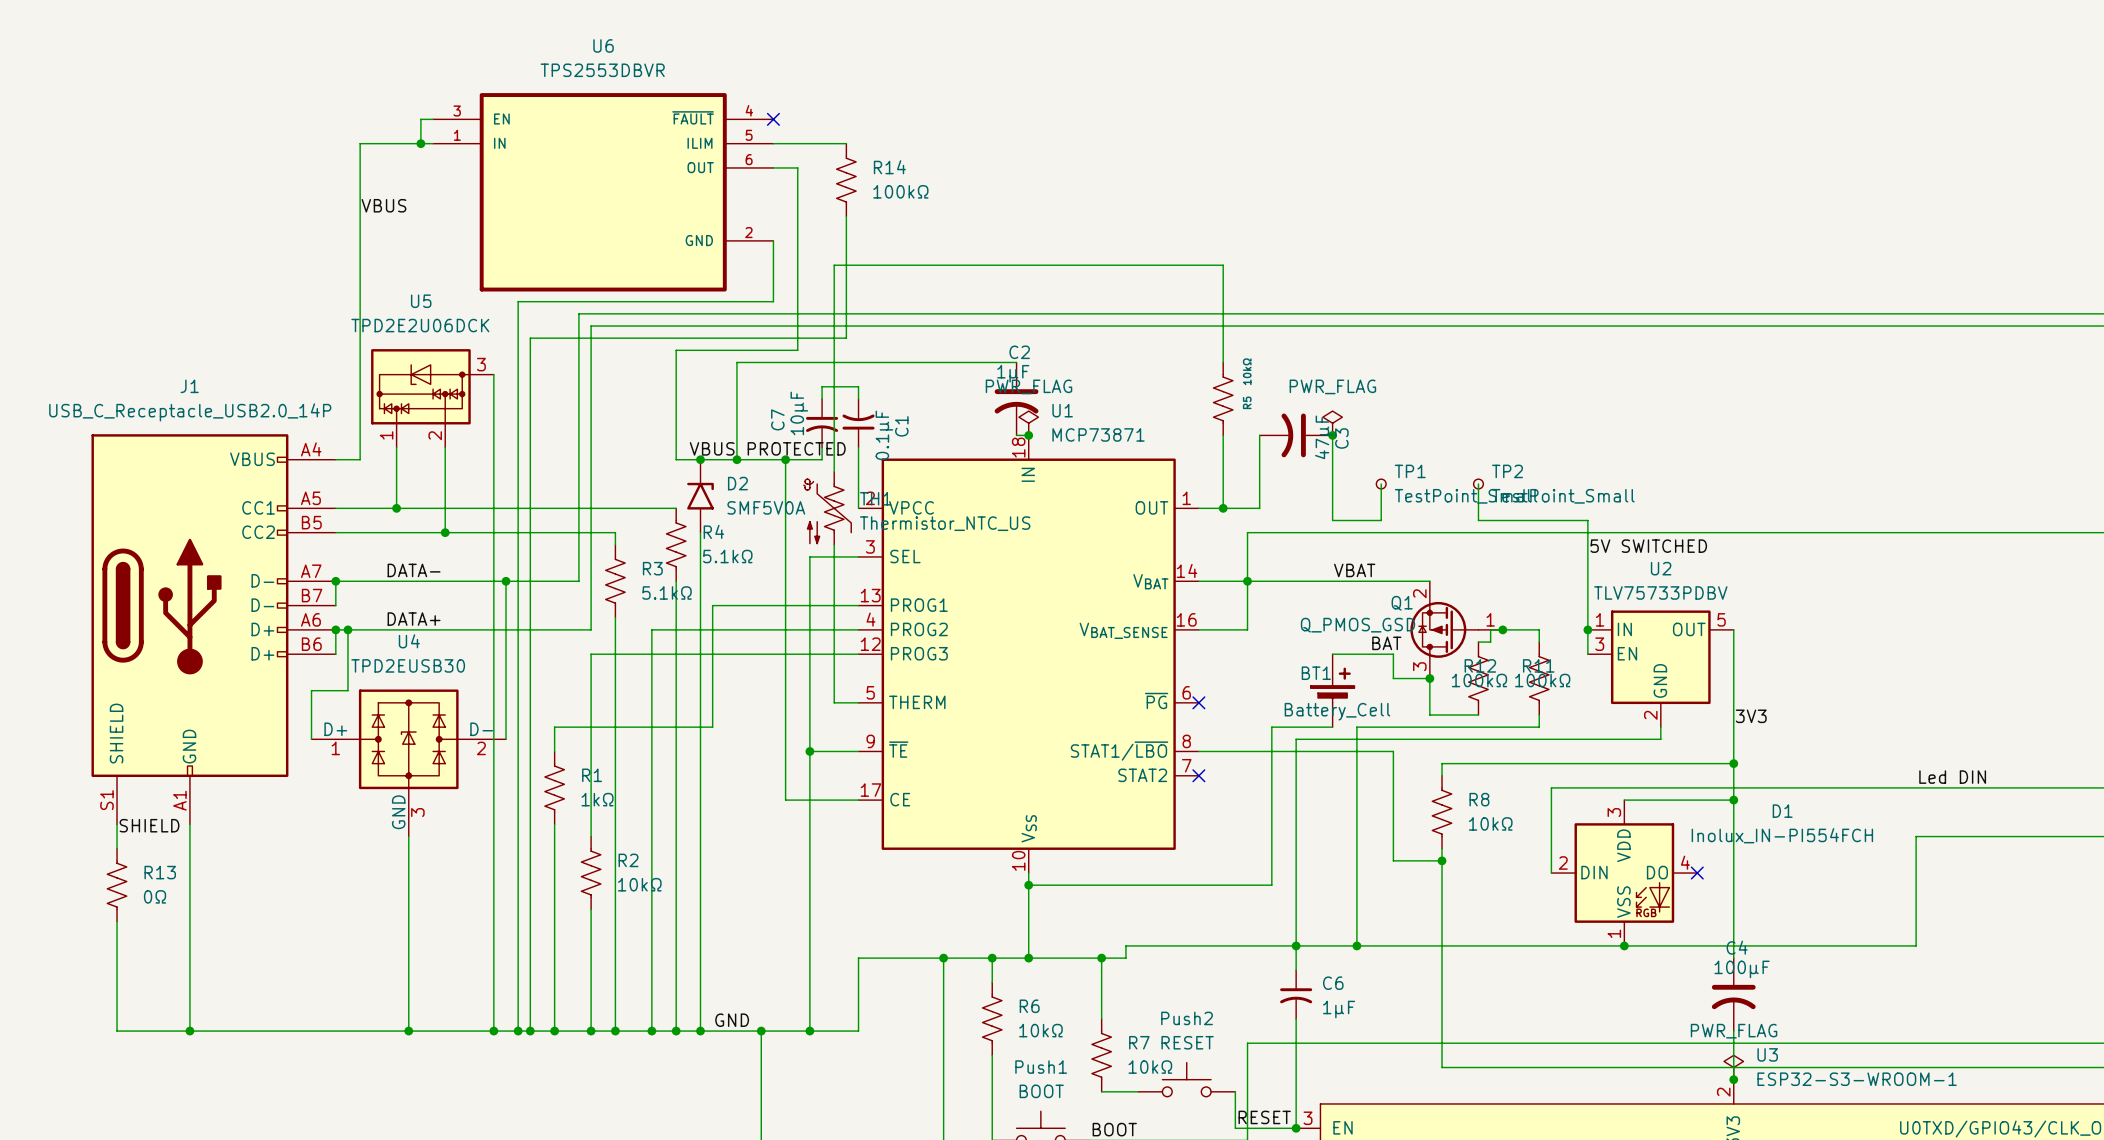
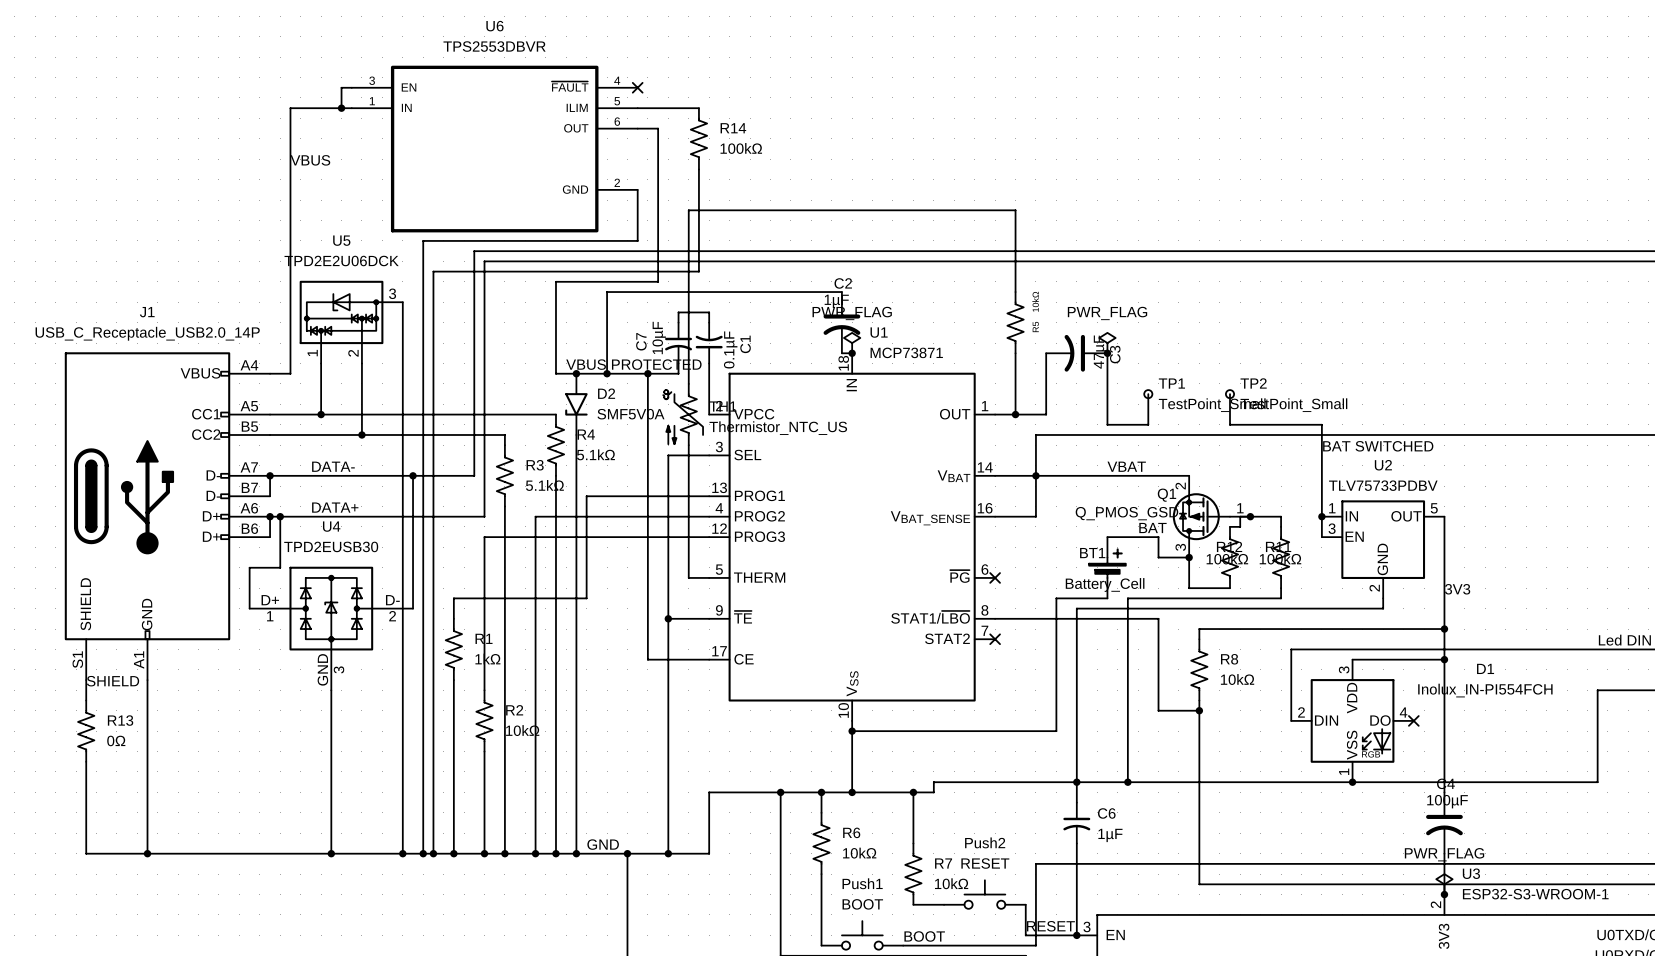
D2 rotation: 0° (700, 496) -> 180° (576, 404)
label: 5V SWITCHED (1648, 546) -> BAT SWITCHED (1378, 446)

